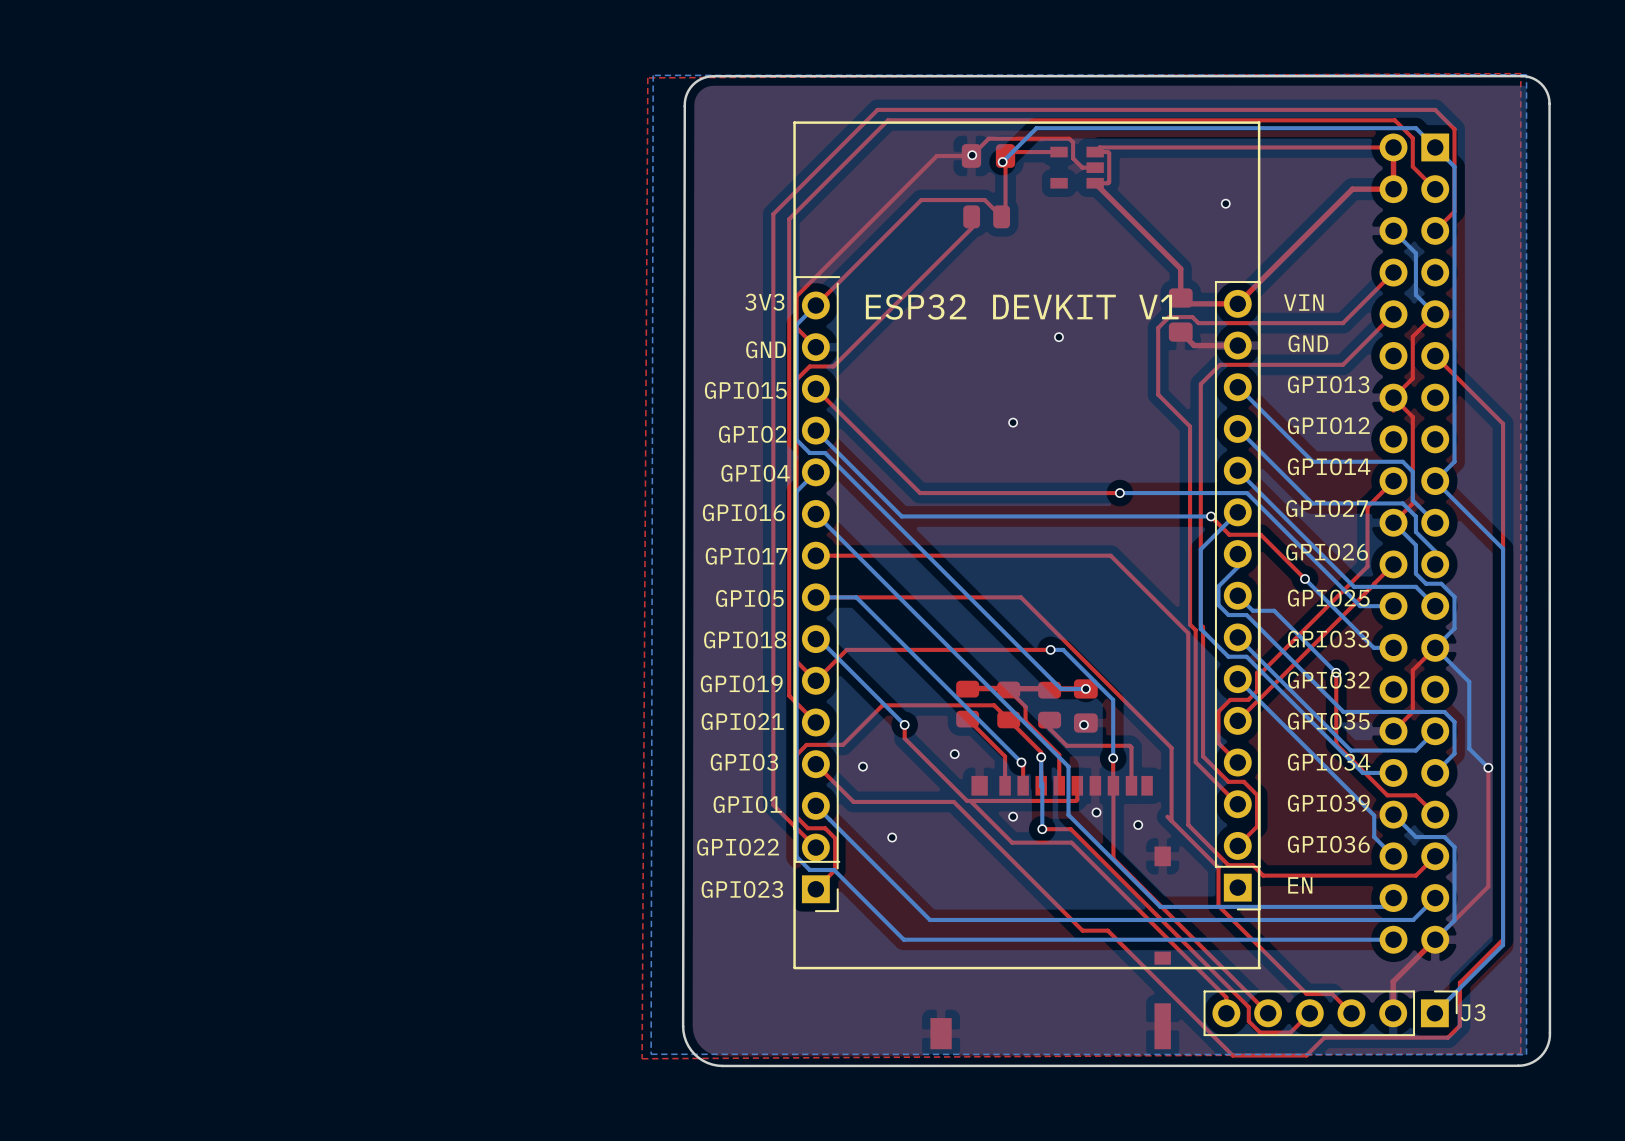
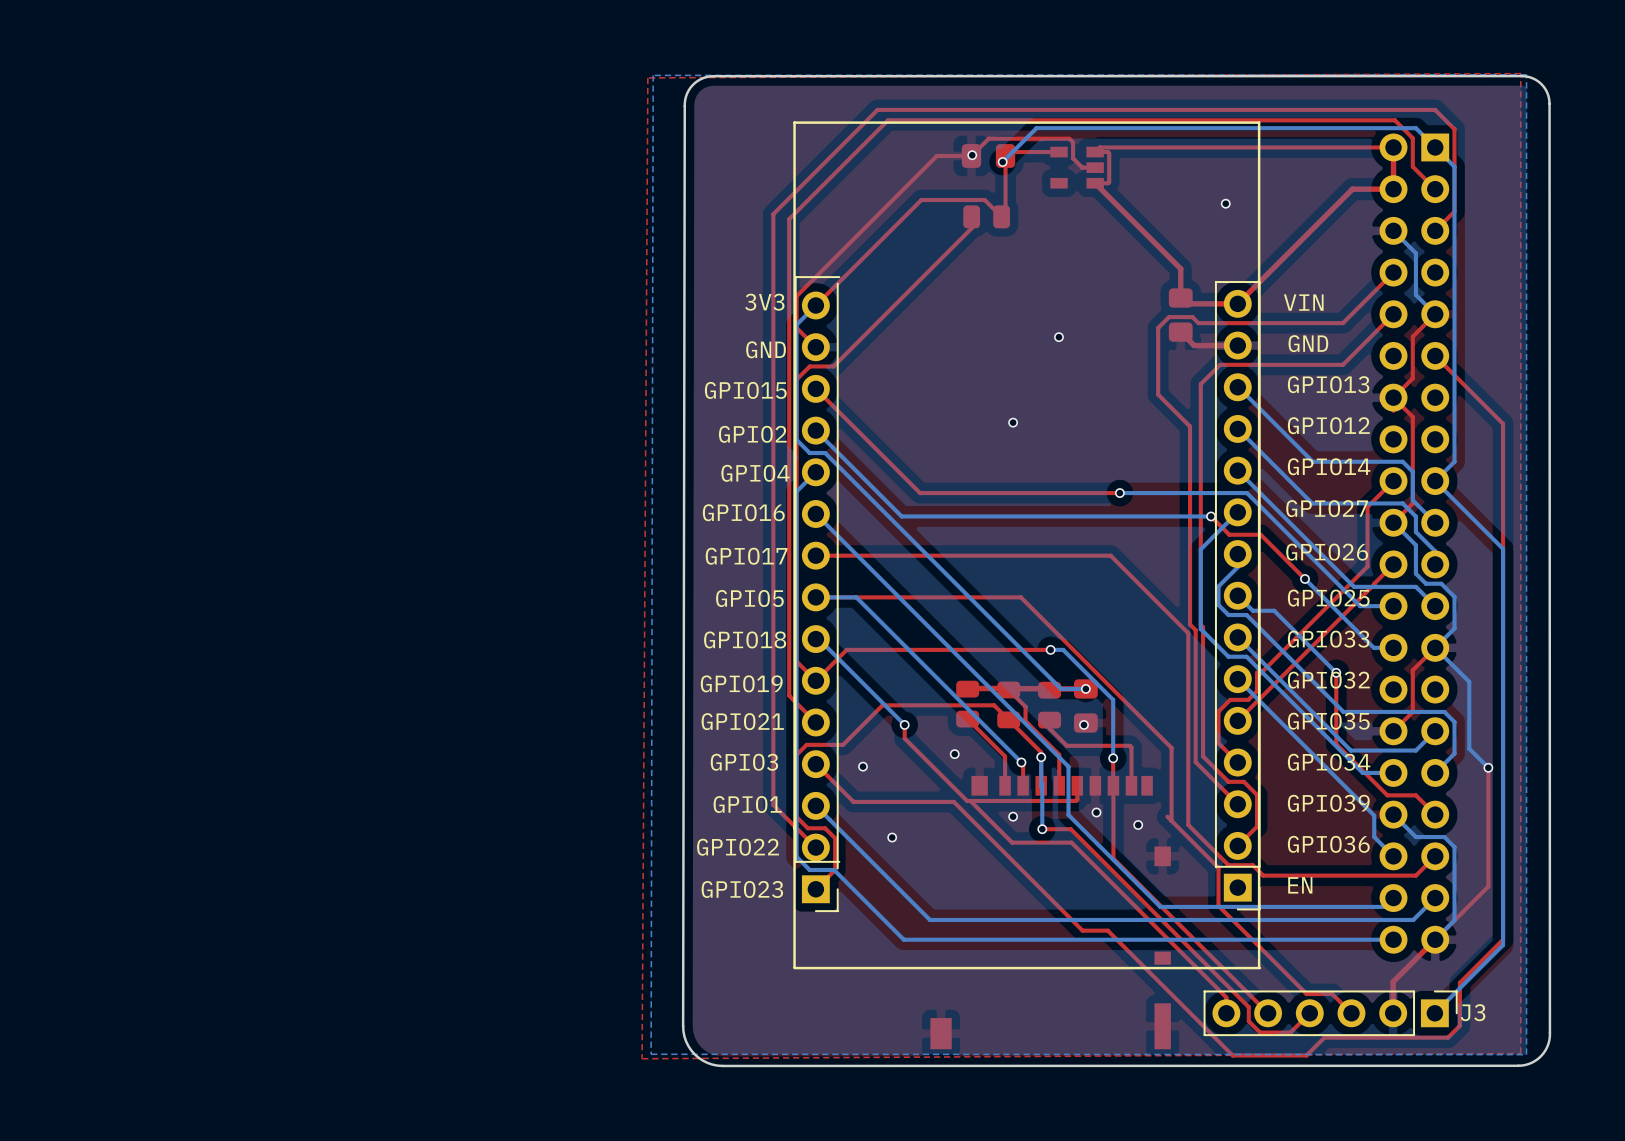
text: ESP32 DEVKIT V1 (1022, 307) -> none

